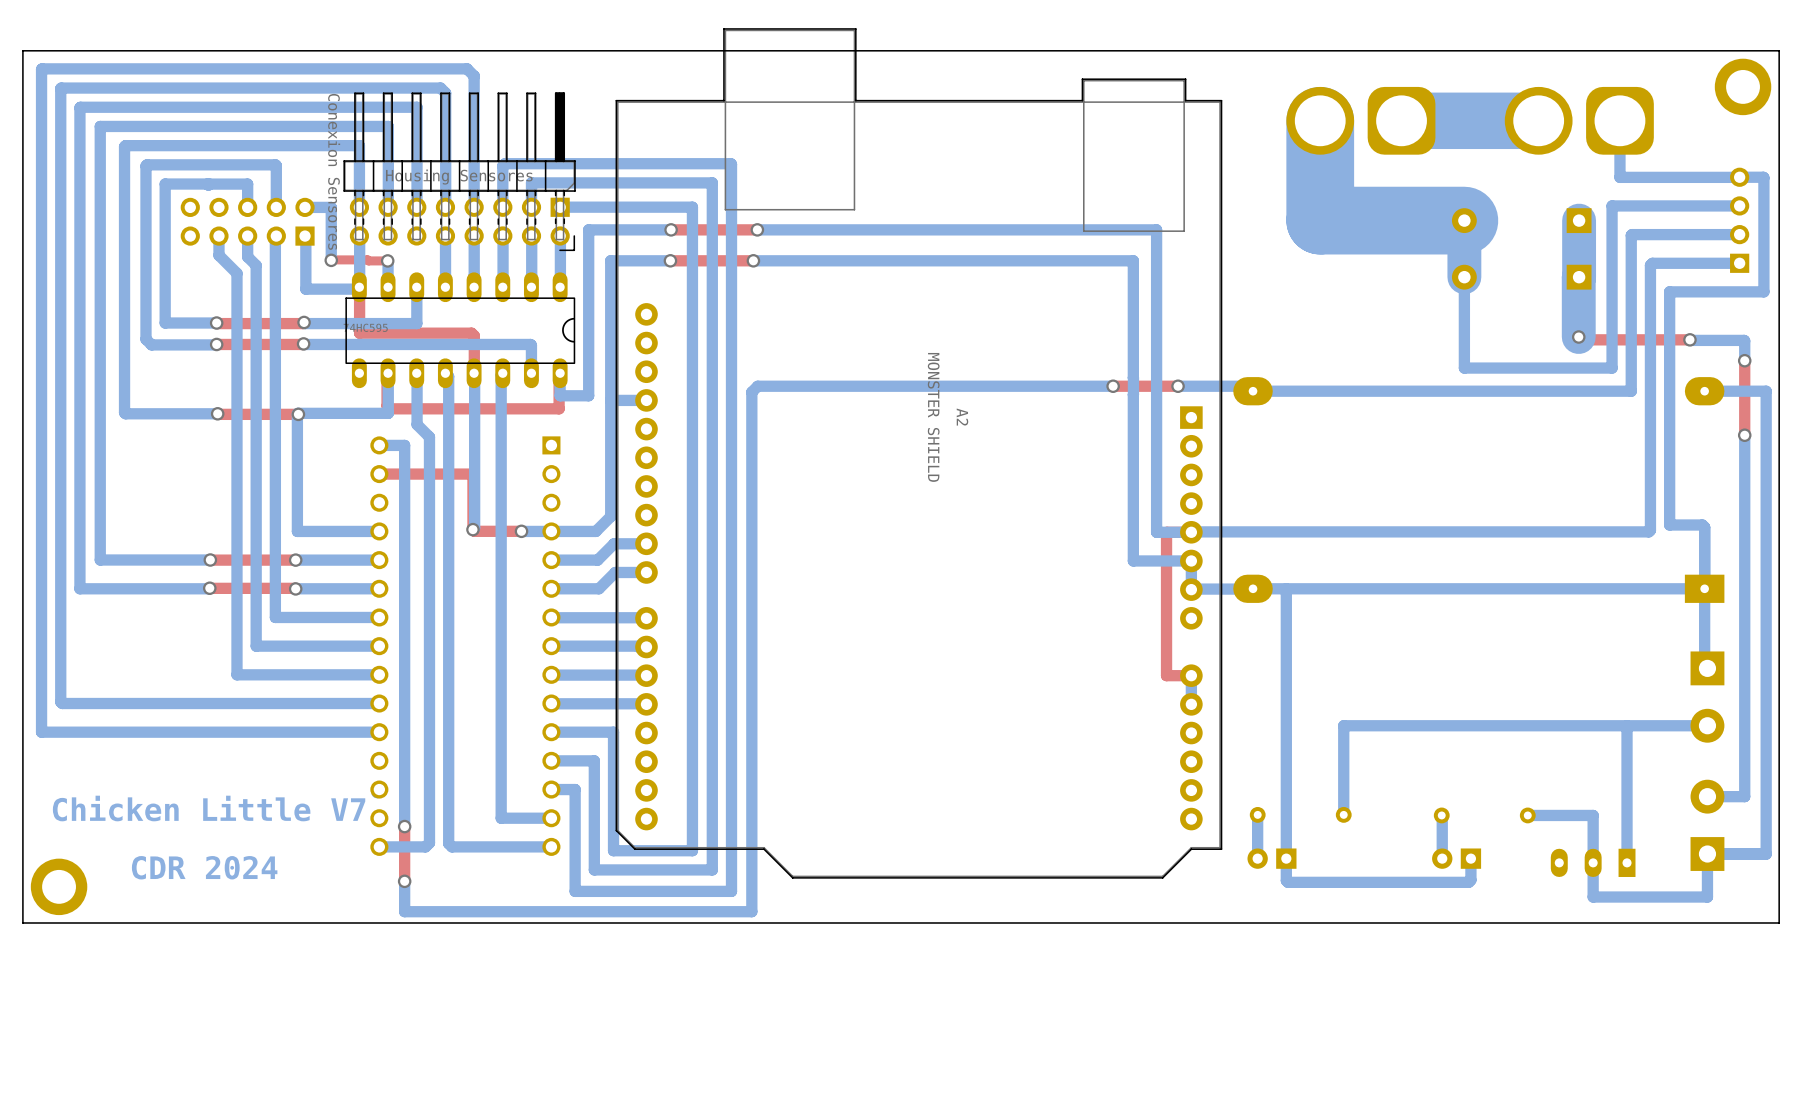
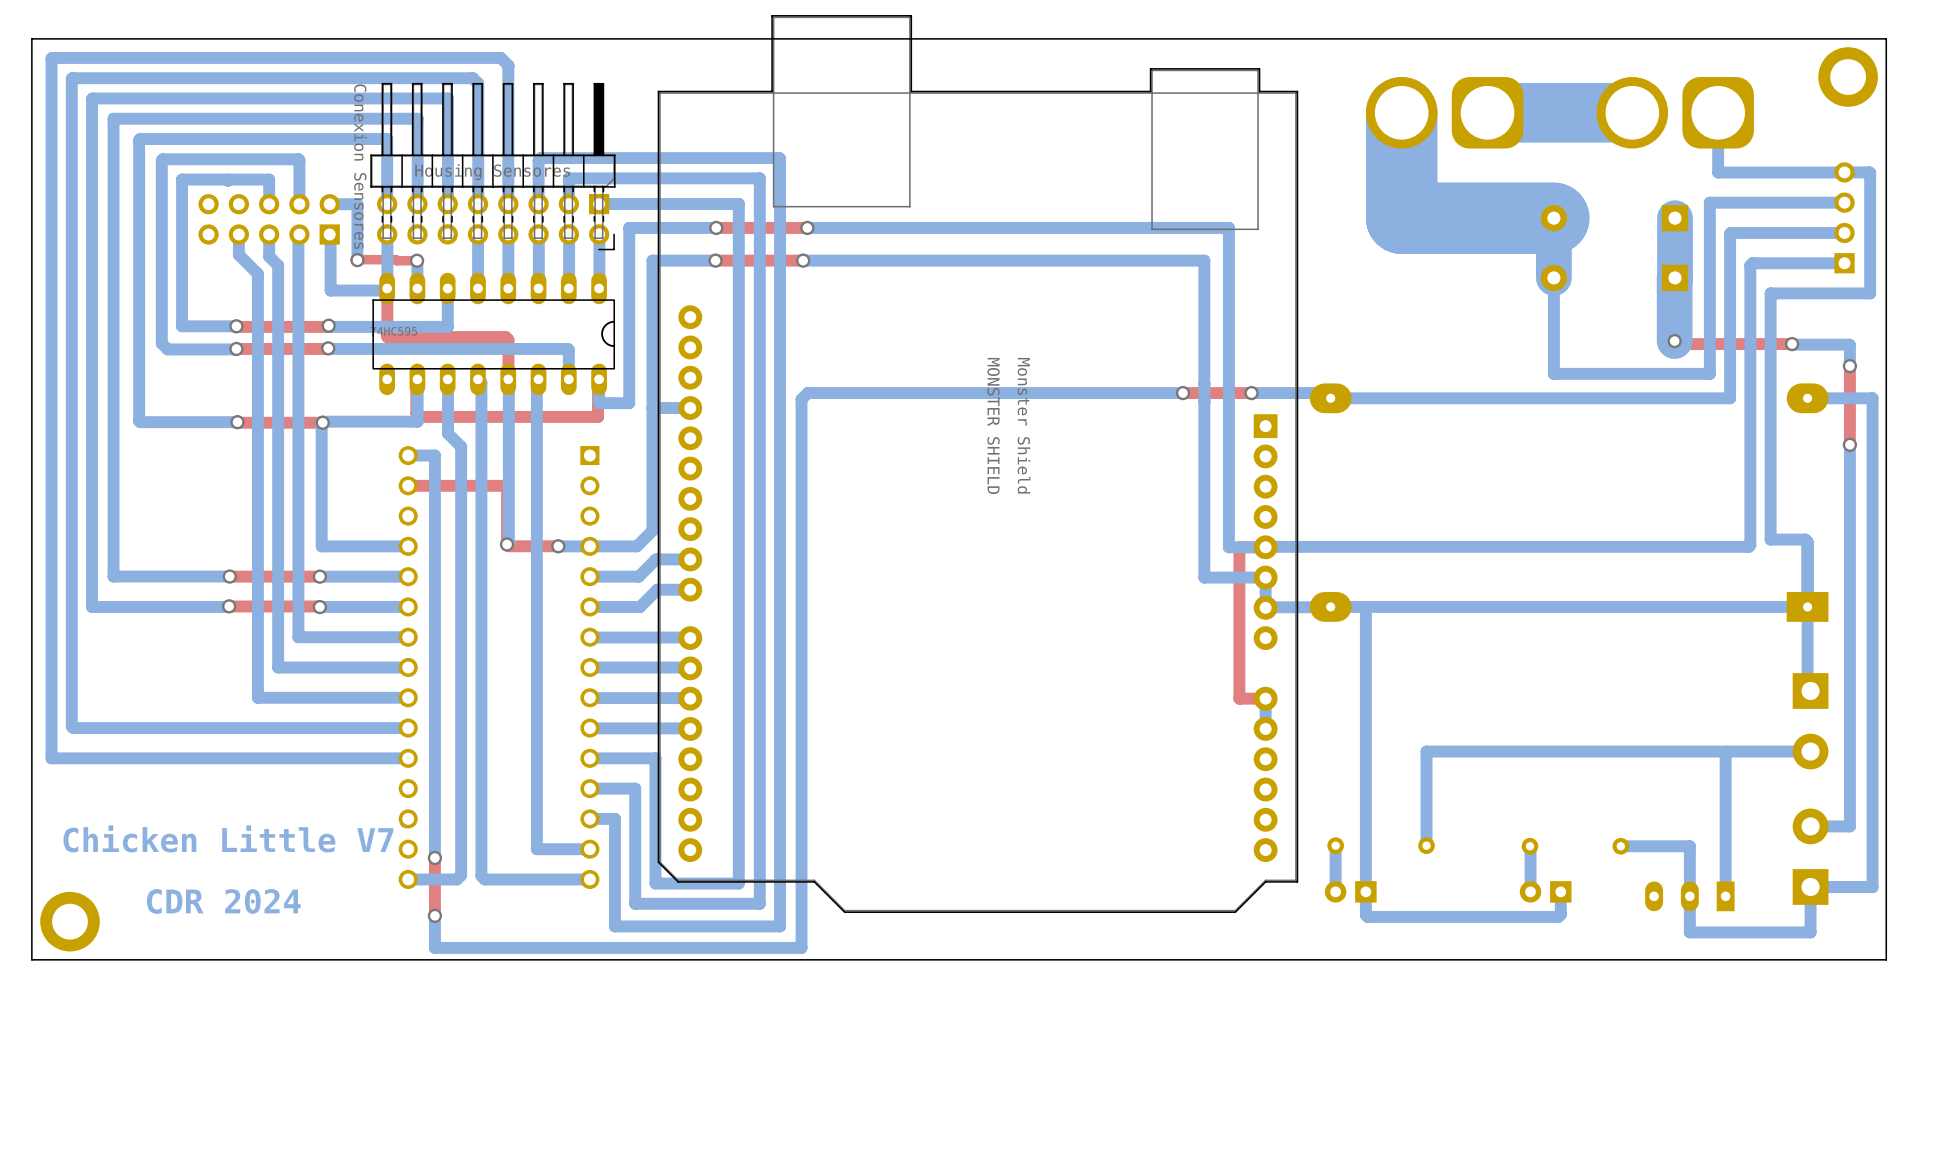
A2 name: A2 (962, 417) -> Monster Shield (1024, 425)

